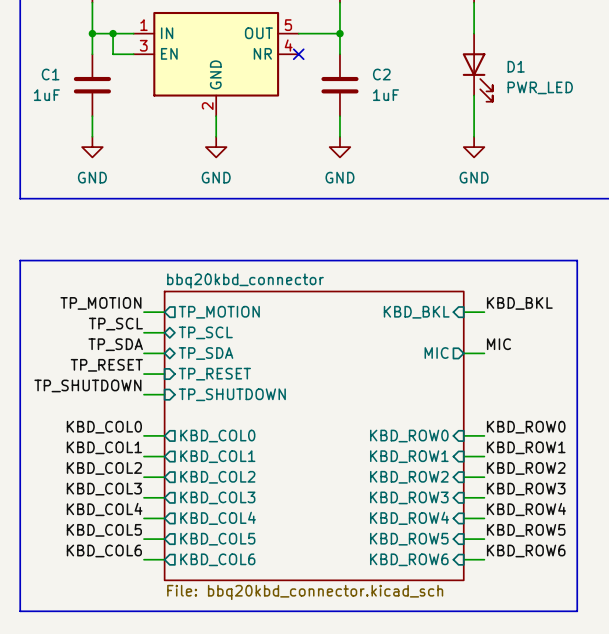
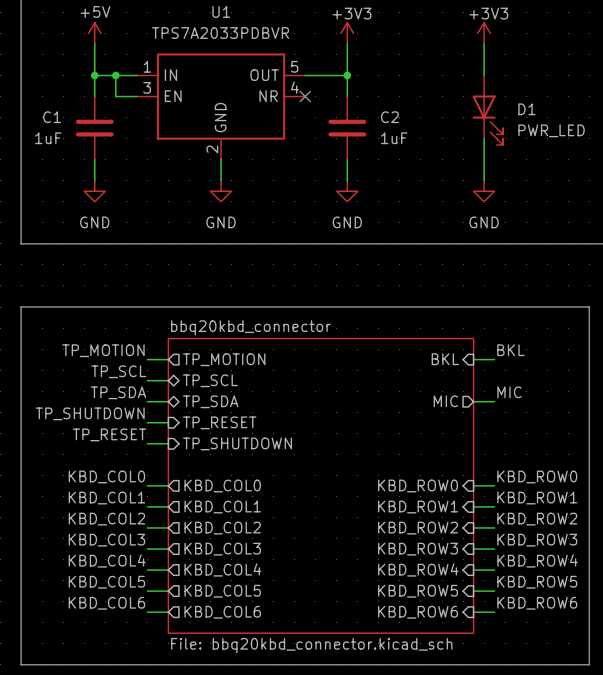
label: KBD_BKL (519, 303) -> BKL (510, 350)
sheet pin: KBD_BKL (416, 312) -> BKL (445, 359)
label: TP_RESET (106, 365) -> TP_SHUTDOWN (90, 413)
label: TP_SHUTDOWN (87, 385) -> TP_RESET (109, 434)

